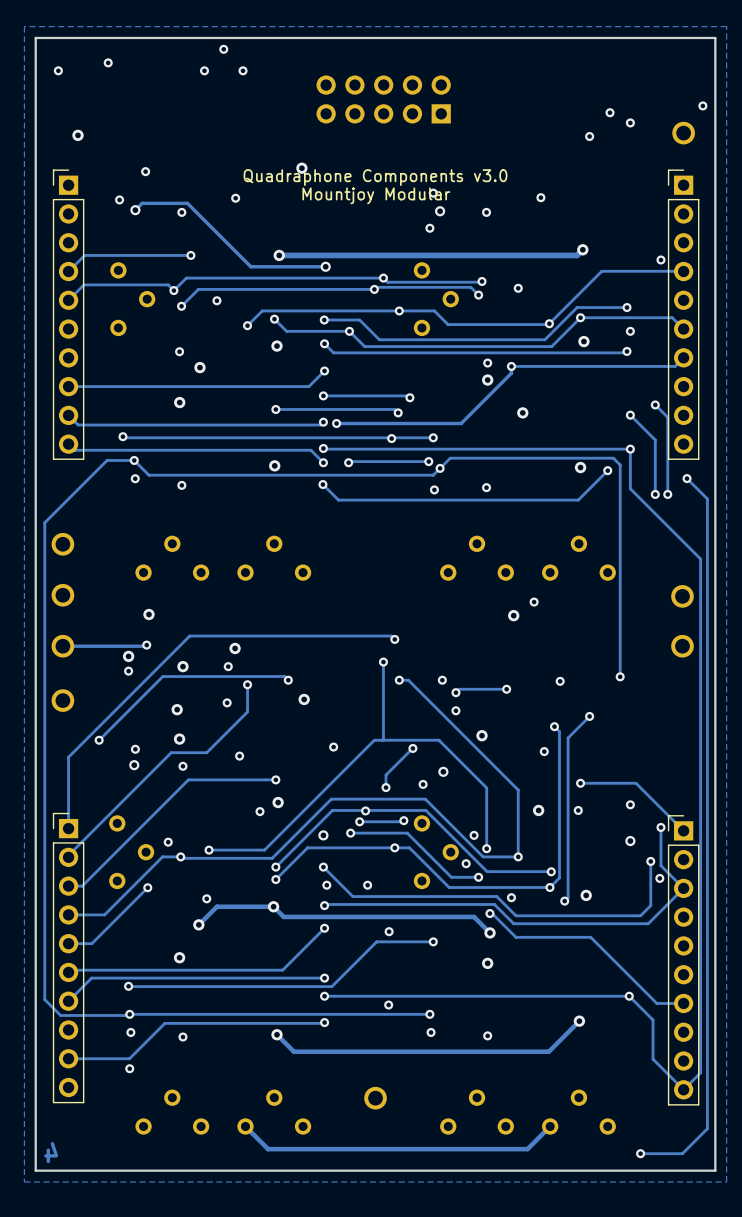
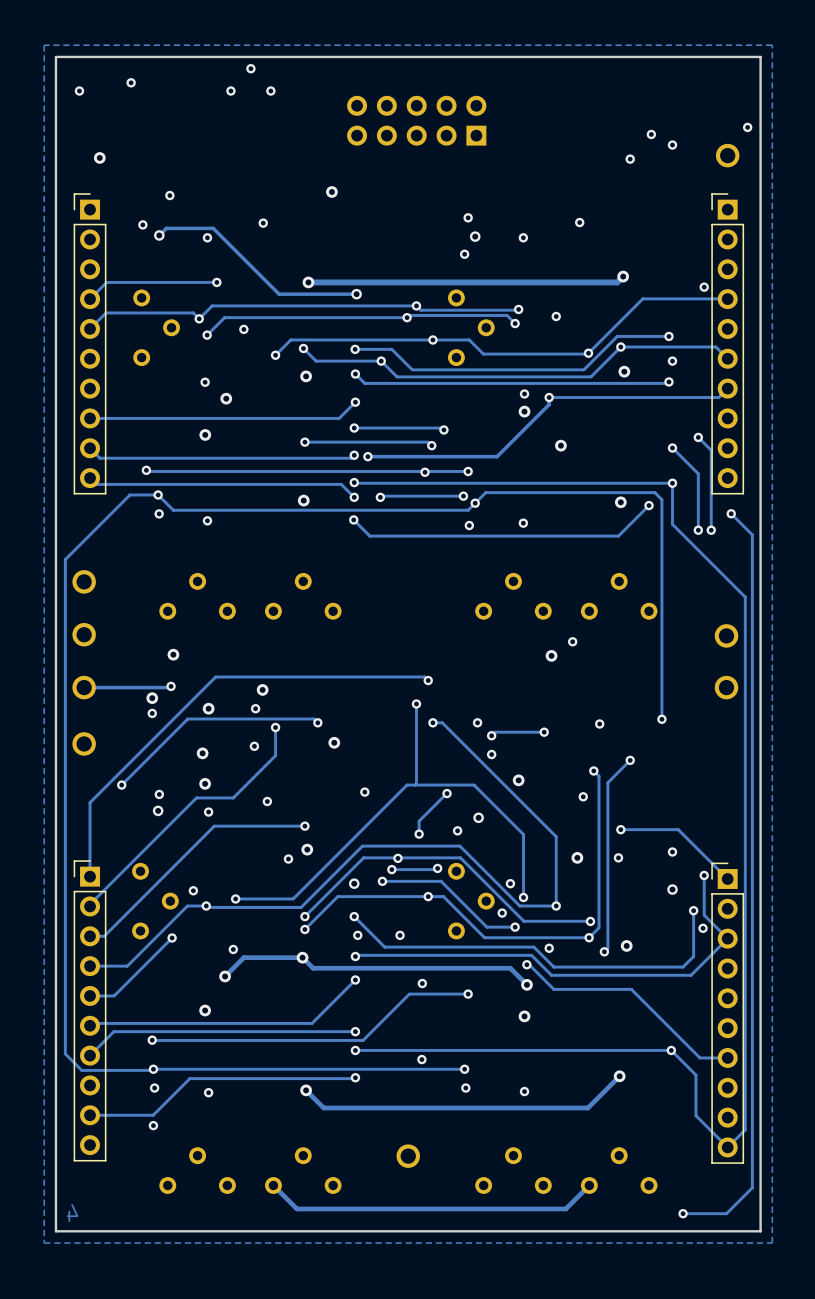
text: Quadraphone Components v3.0 (375, 177) -> none
text: Mountjoy Modular (376, 195) -> none

